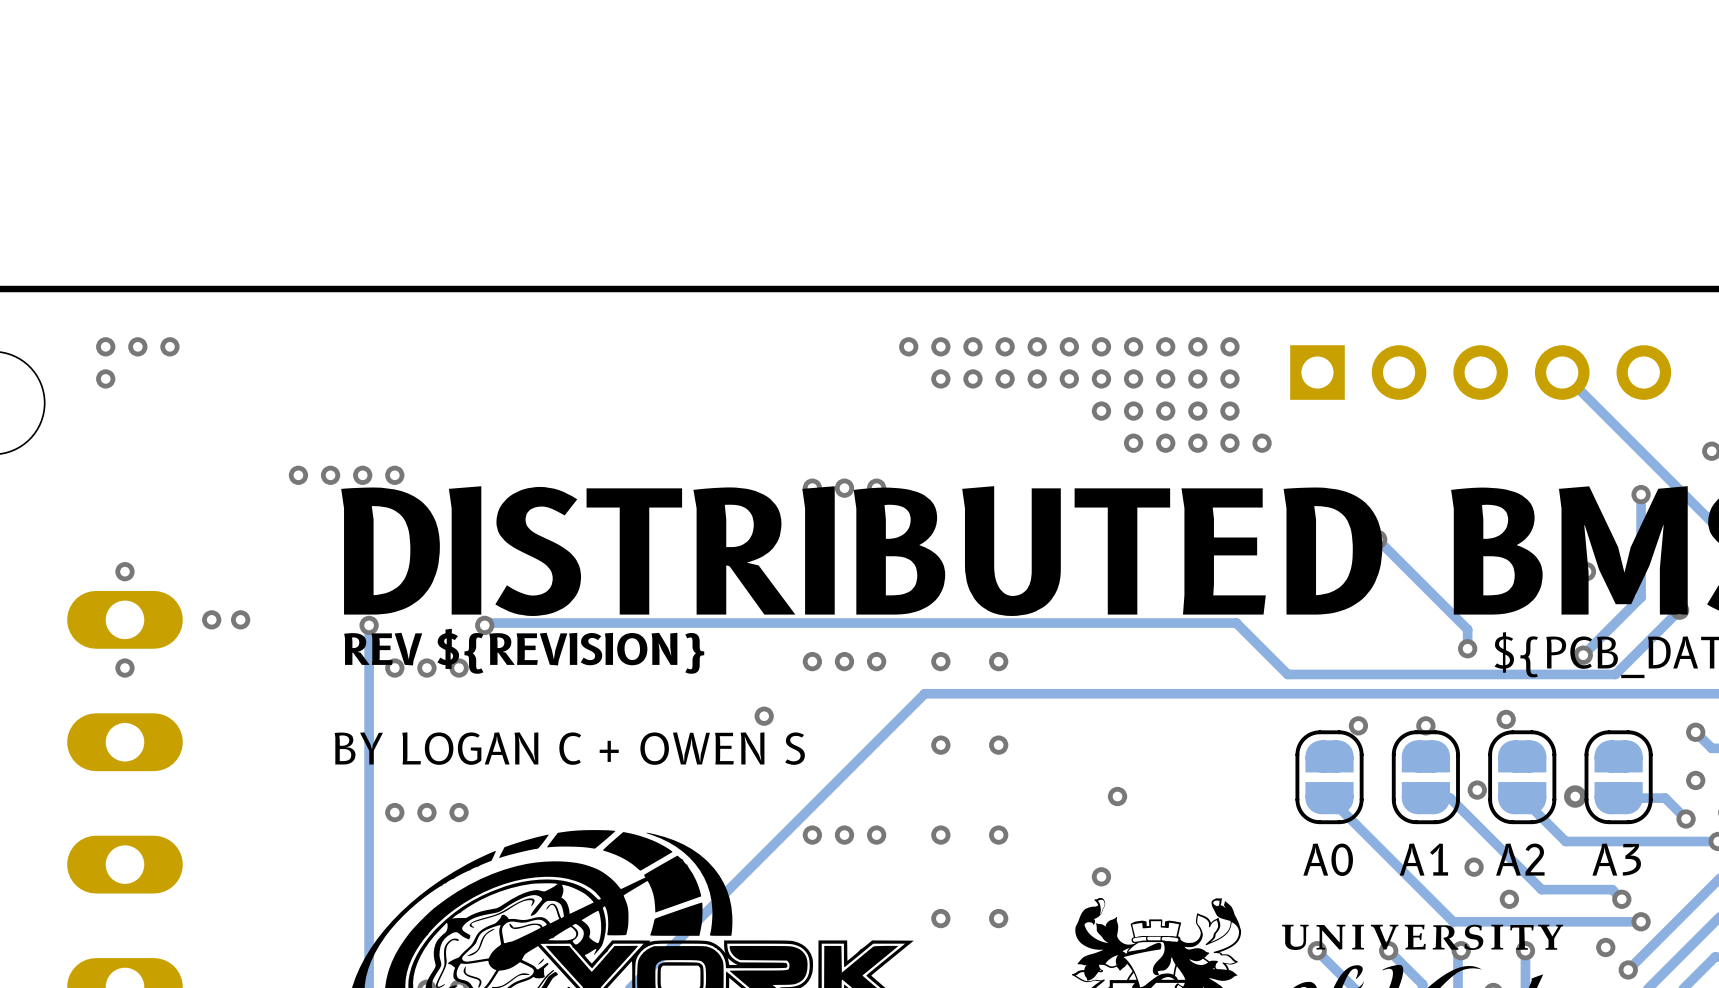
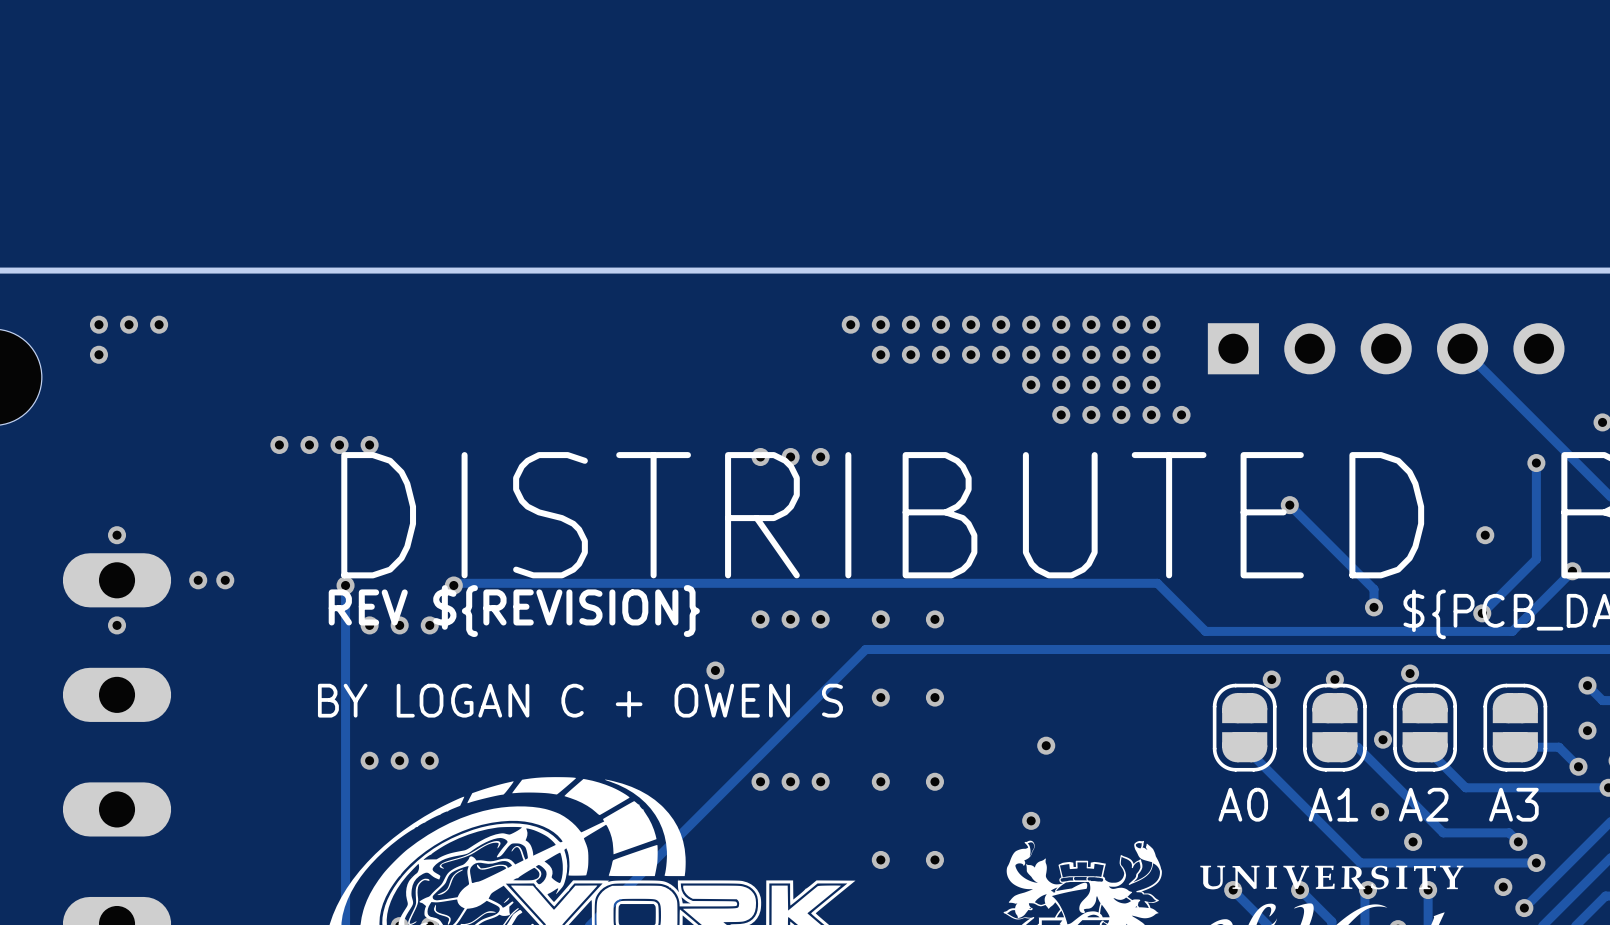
via: (1575, 796) -> none

